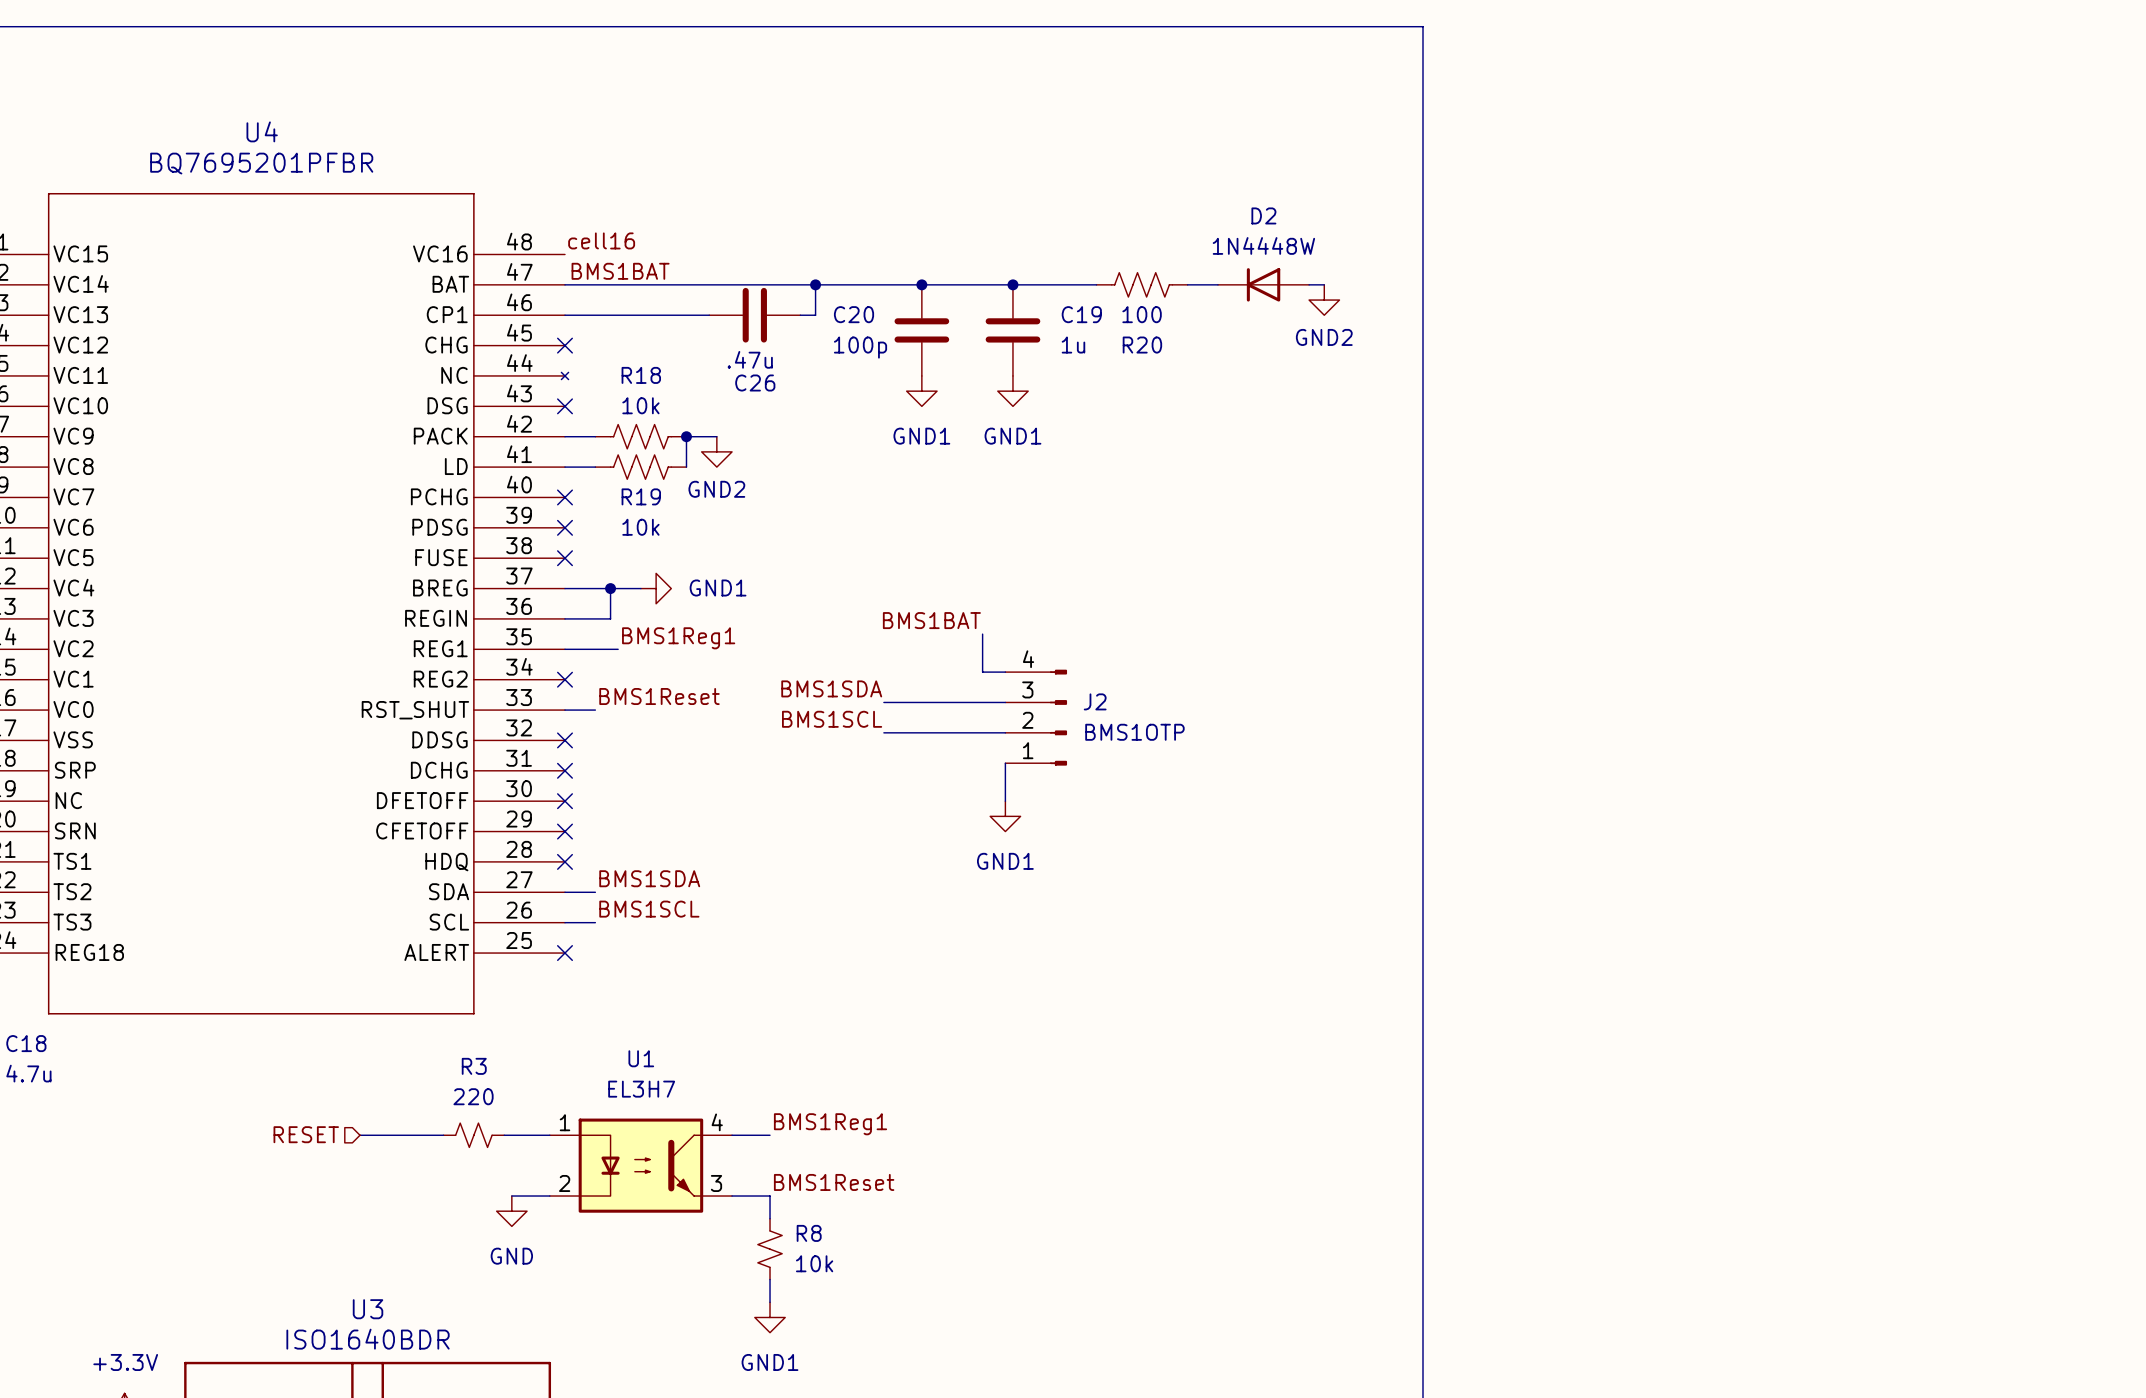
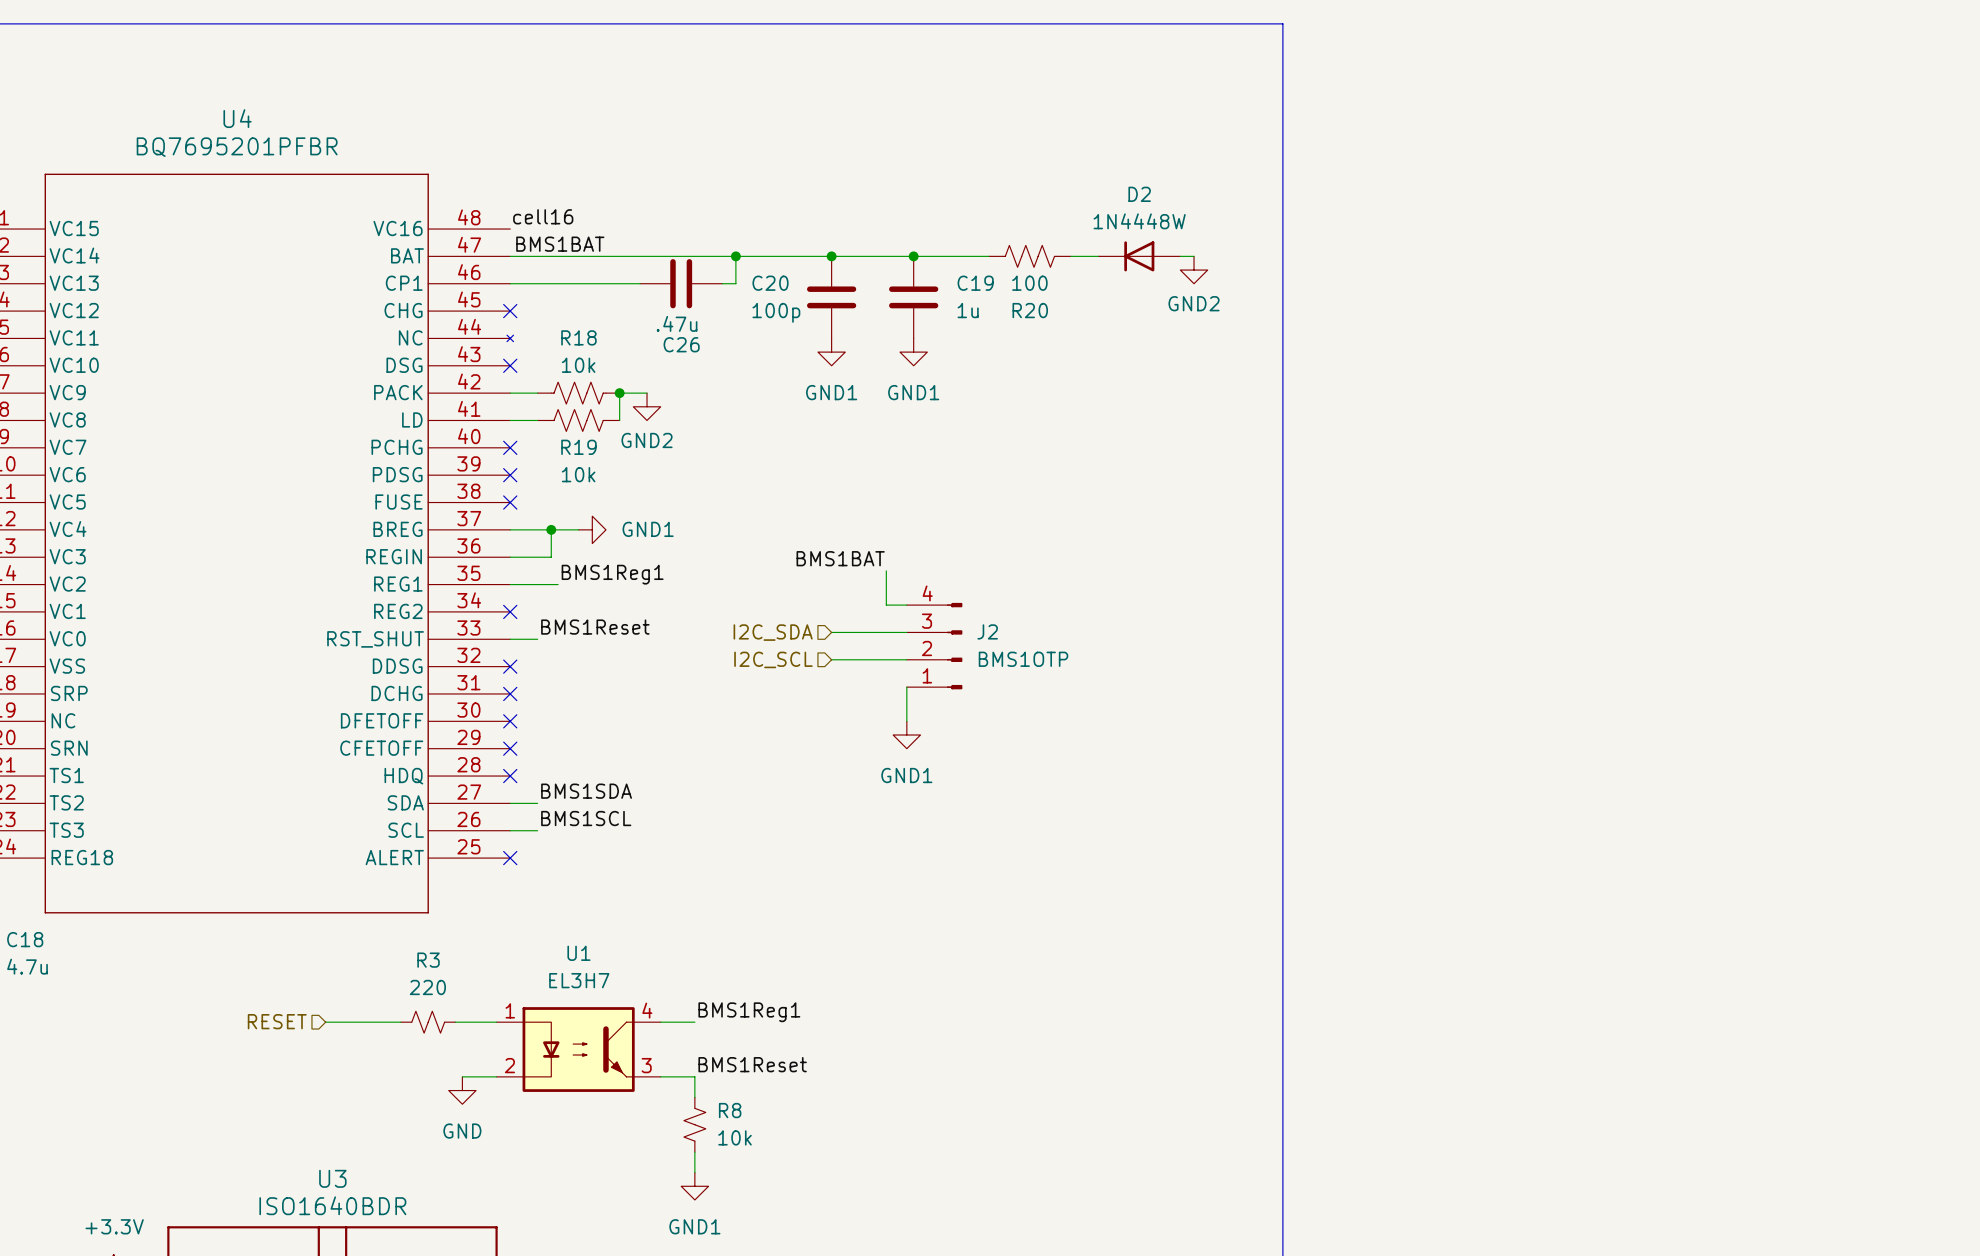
label: BMS1SDA (831, 688) -> none
hierarchical label: none -> I2C_SDA (773, 632)
wire: (883, 702) (921, 702) -> none
label: BMS1SCL (832, 719) -> none
hierarchical label: none -> I2C_SCL (773, 659)
wire: (883, 732) (921, 732) -> none

